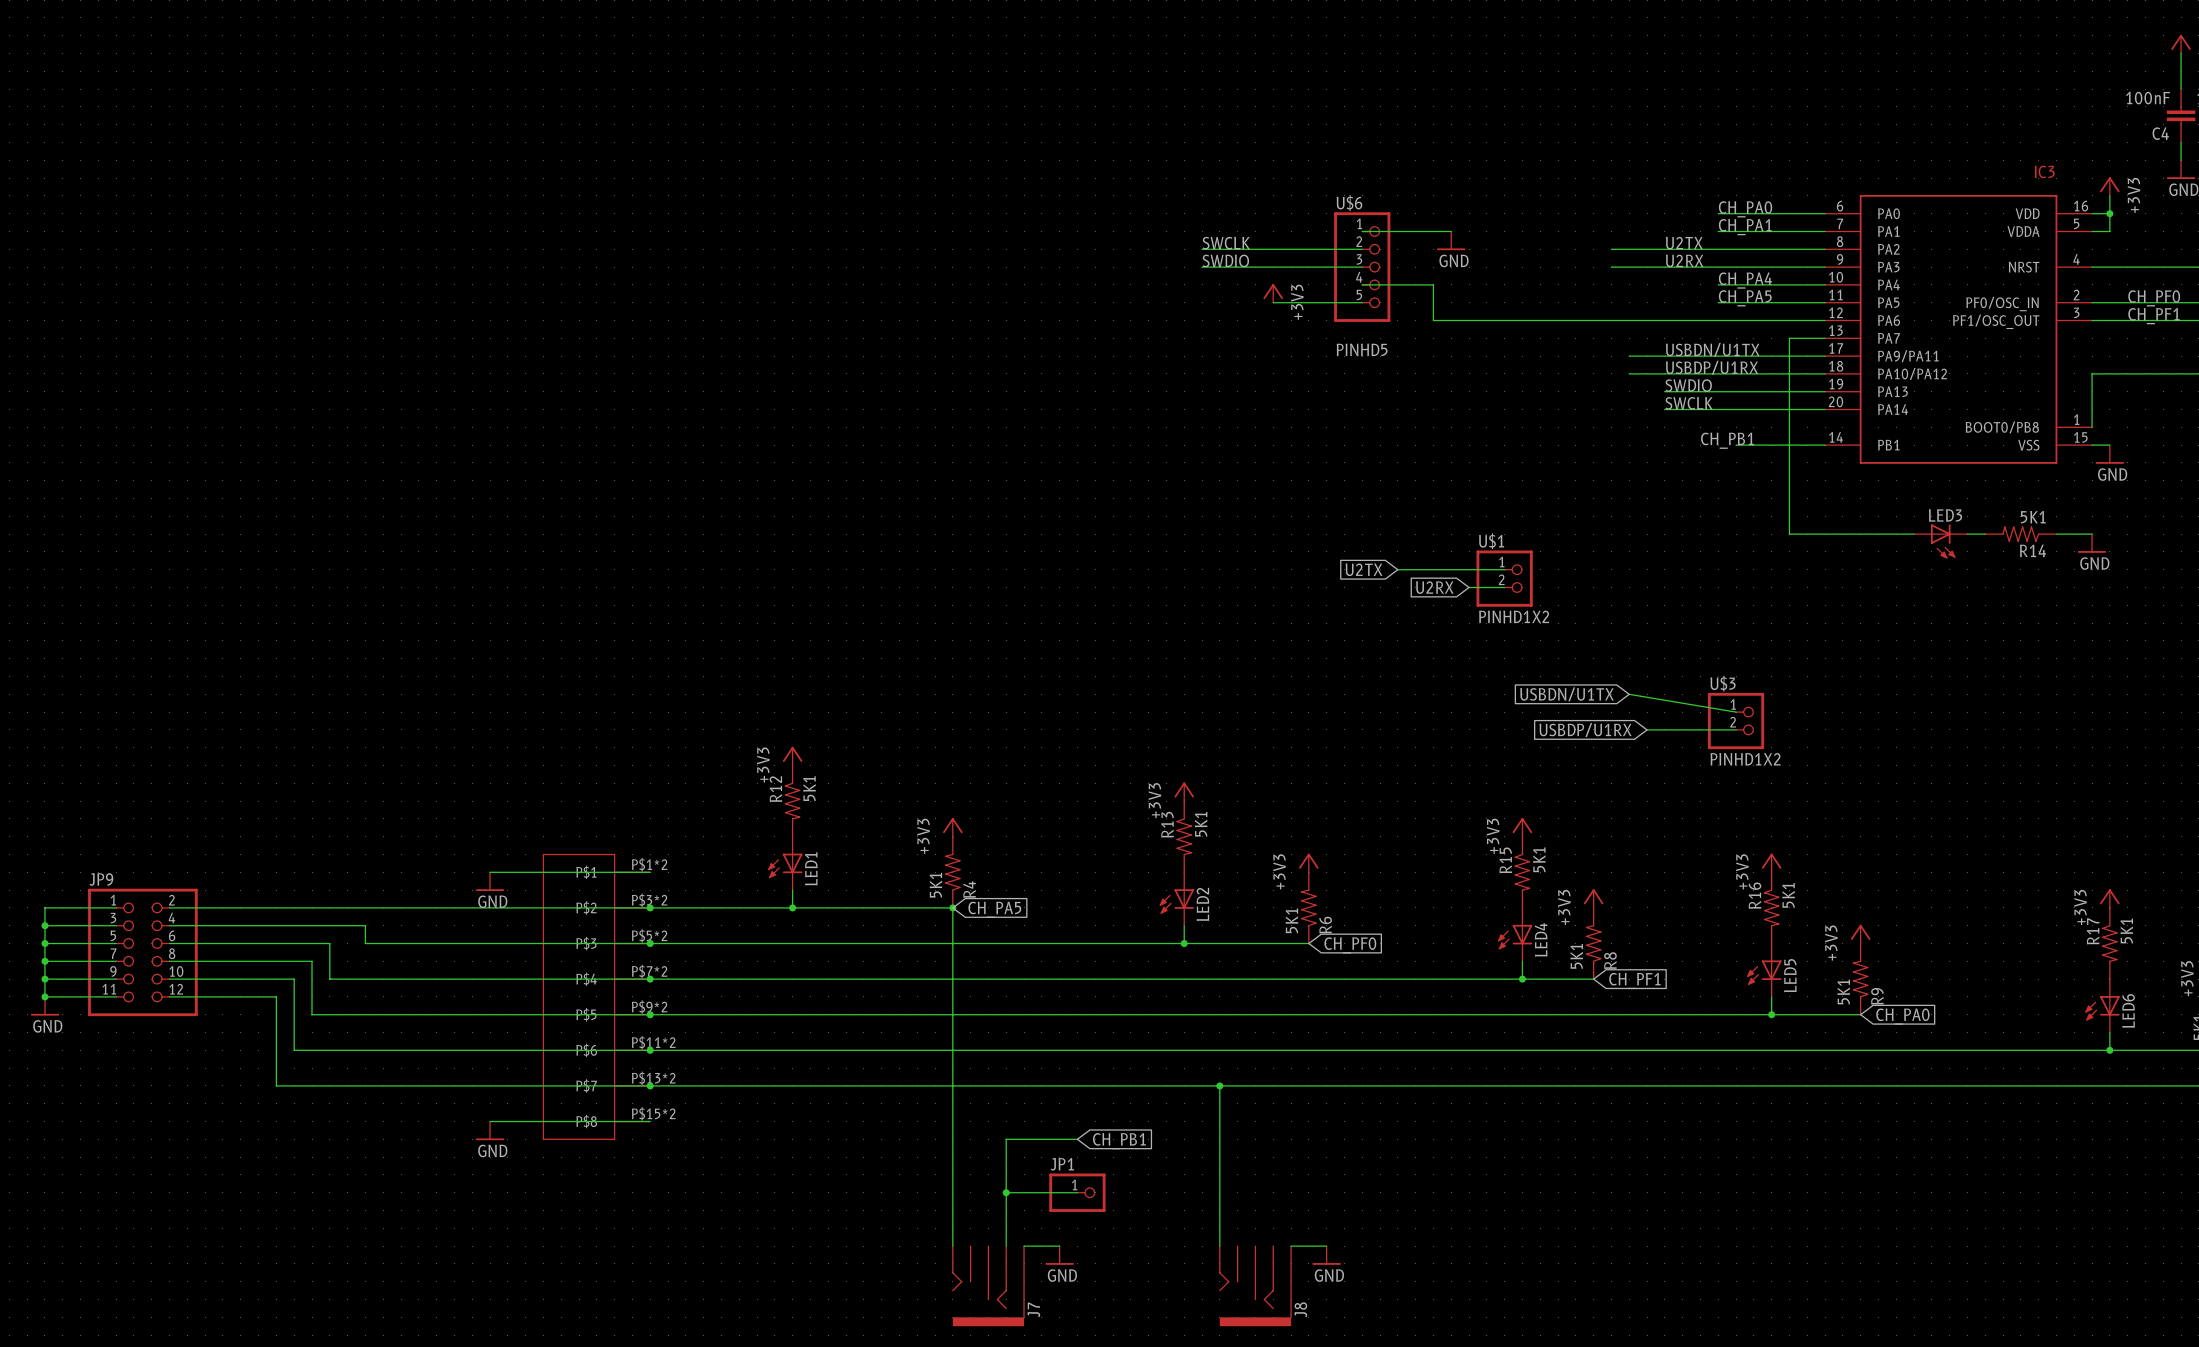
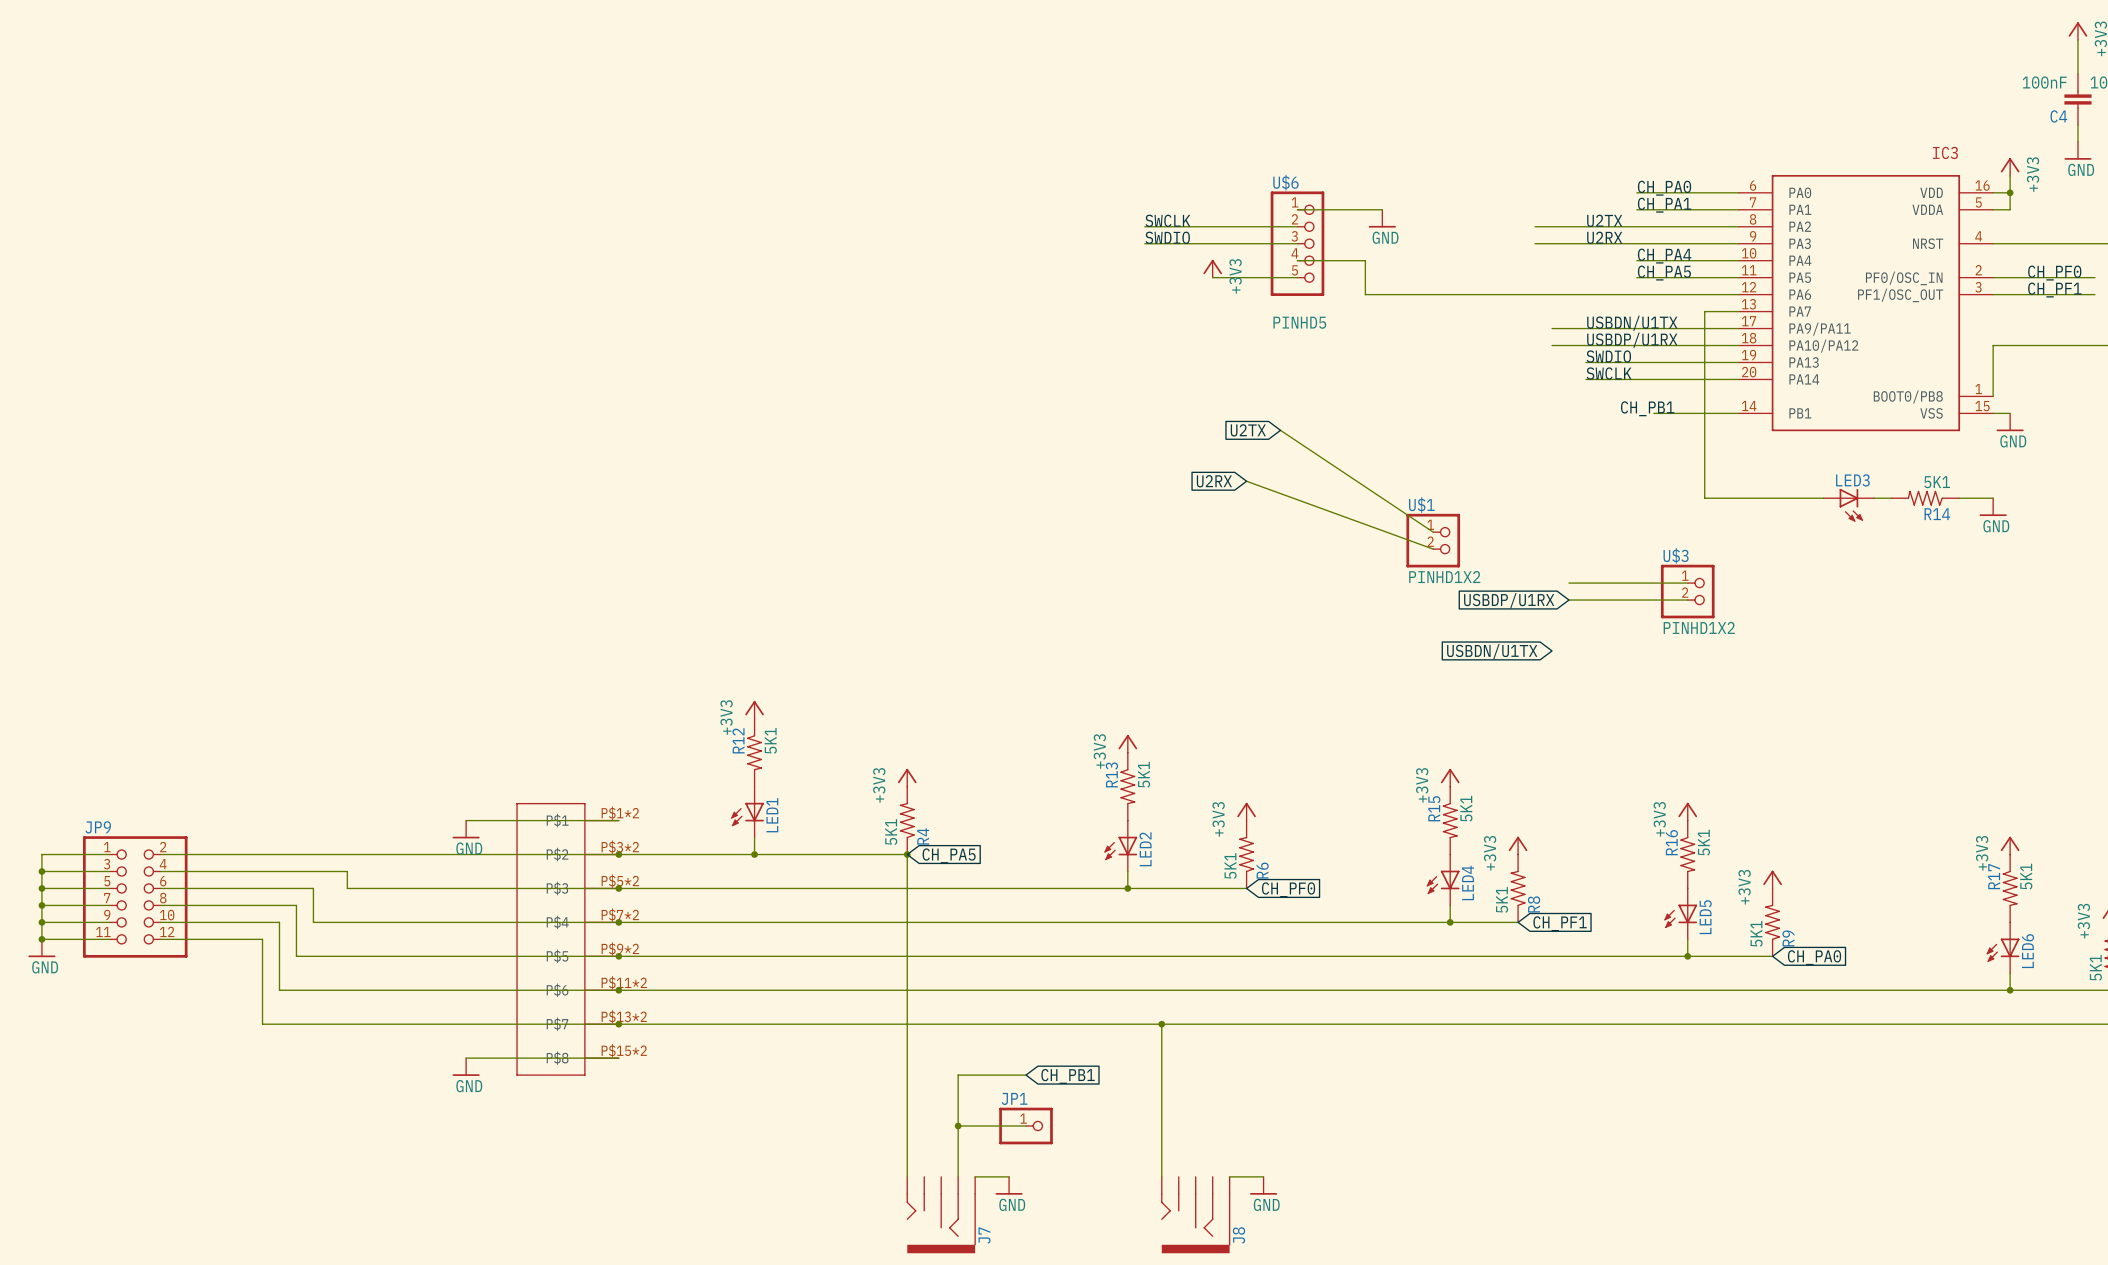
global label: none -> U2RX (1214, 481)
global label position: U2TX (1364, 569) -> U2TX (1248, 430)
wire: (1397, 569) (1504, 569) -> (1280, 430) (1433, 532)
global label: U2RX (1434, 587) -> none
wire: (1469, 587) (1504, 587) -> (1246, 481) (1433, 549)
wire: none -> (1568, 583) (1687, 583)
wire: none -> (1568, 600) (1687, 600)
wire: (1629, 694) (1736, 712) -> none
U$3 position: (1736, 721) -> (1687, 591)
wire: (1647, 729) (1736, 729) -> none
global label position: USBDP/U1RX (1585, 730) -> USBDP/U1RX (1509, 600)

